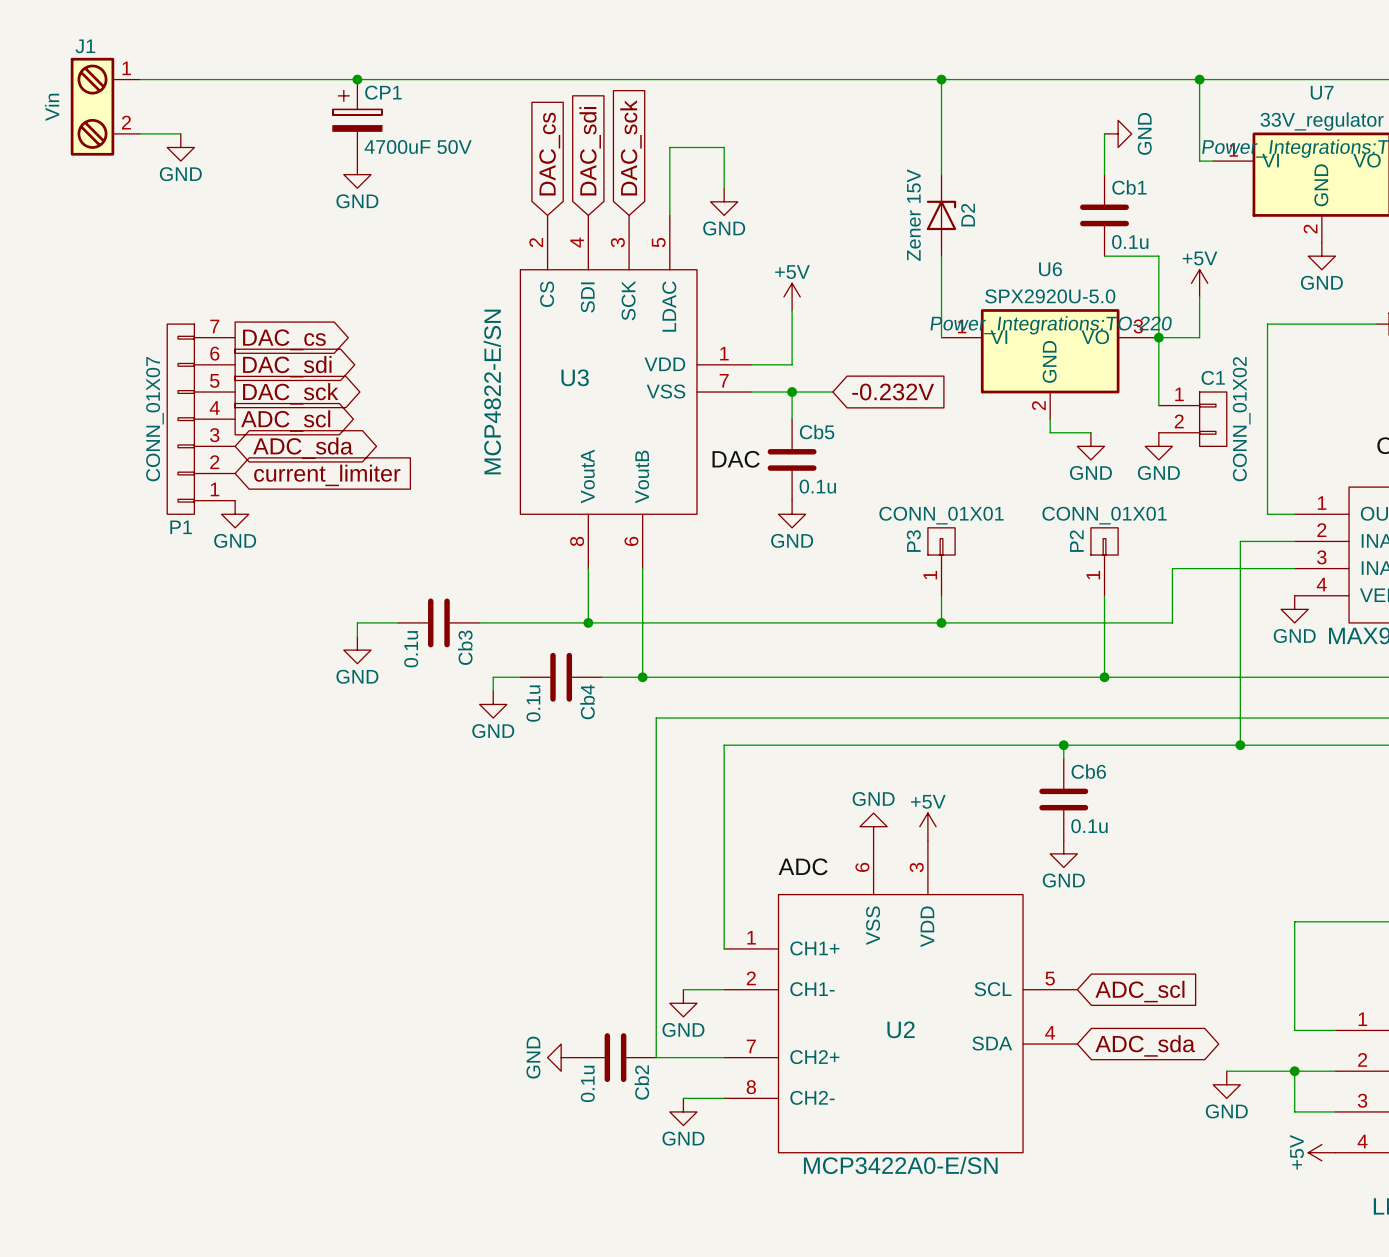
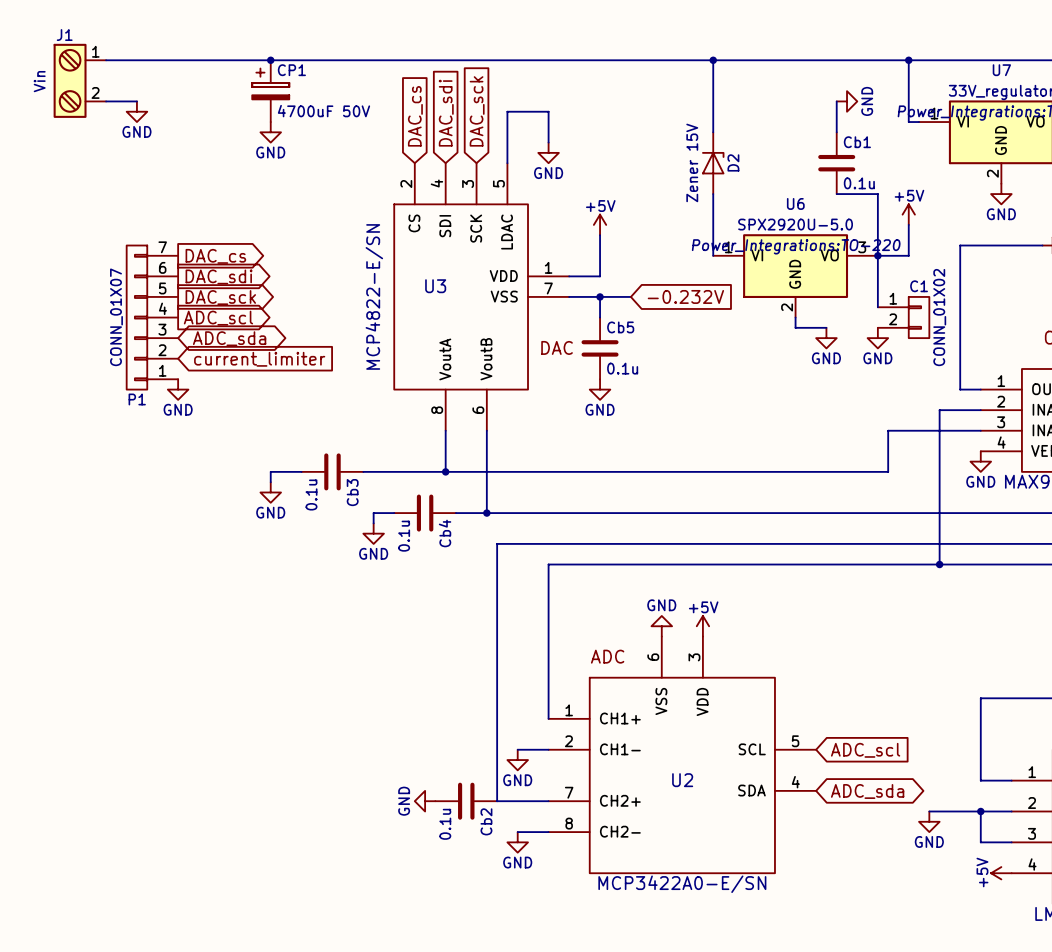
P3: CONN_01X01 (941, 561) -> none
P2: CONN_01X01 (1104, 561) -> none
wire: (941, 595) (941, 622) -> none
wire: (1104, 595) (1104, 677) -> none
junction: (941, 622) -> none
junction: (1104, 677) -> none
wire: (1063, 745) (1063, 758) -> none
junction: (1063, 745) -> none
Cb6: 0.1u (1063, 799) -> none
power symbol: GND (1063, 853) -> none

